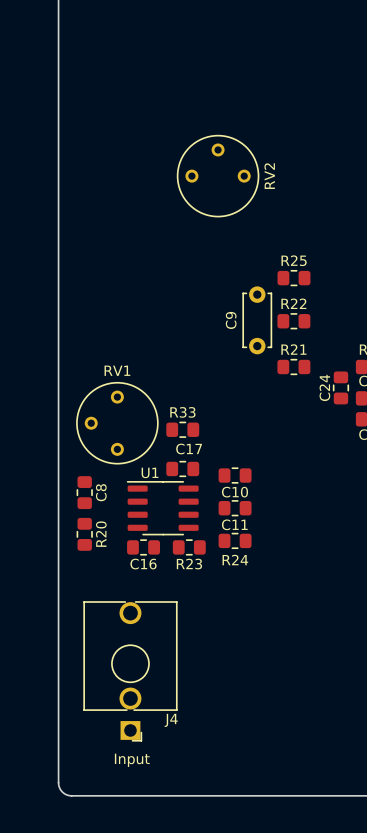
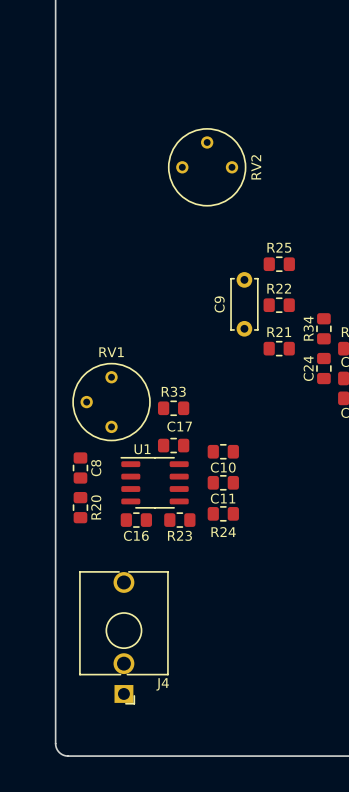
R34: none -> (323, 328)
text: Input (132, 760) -> none

